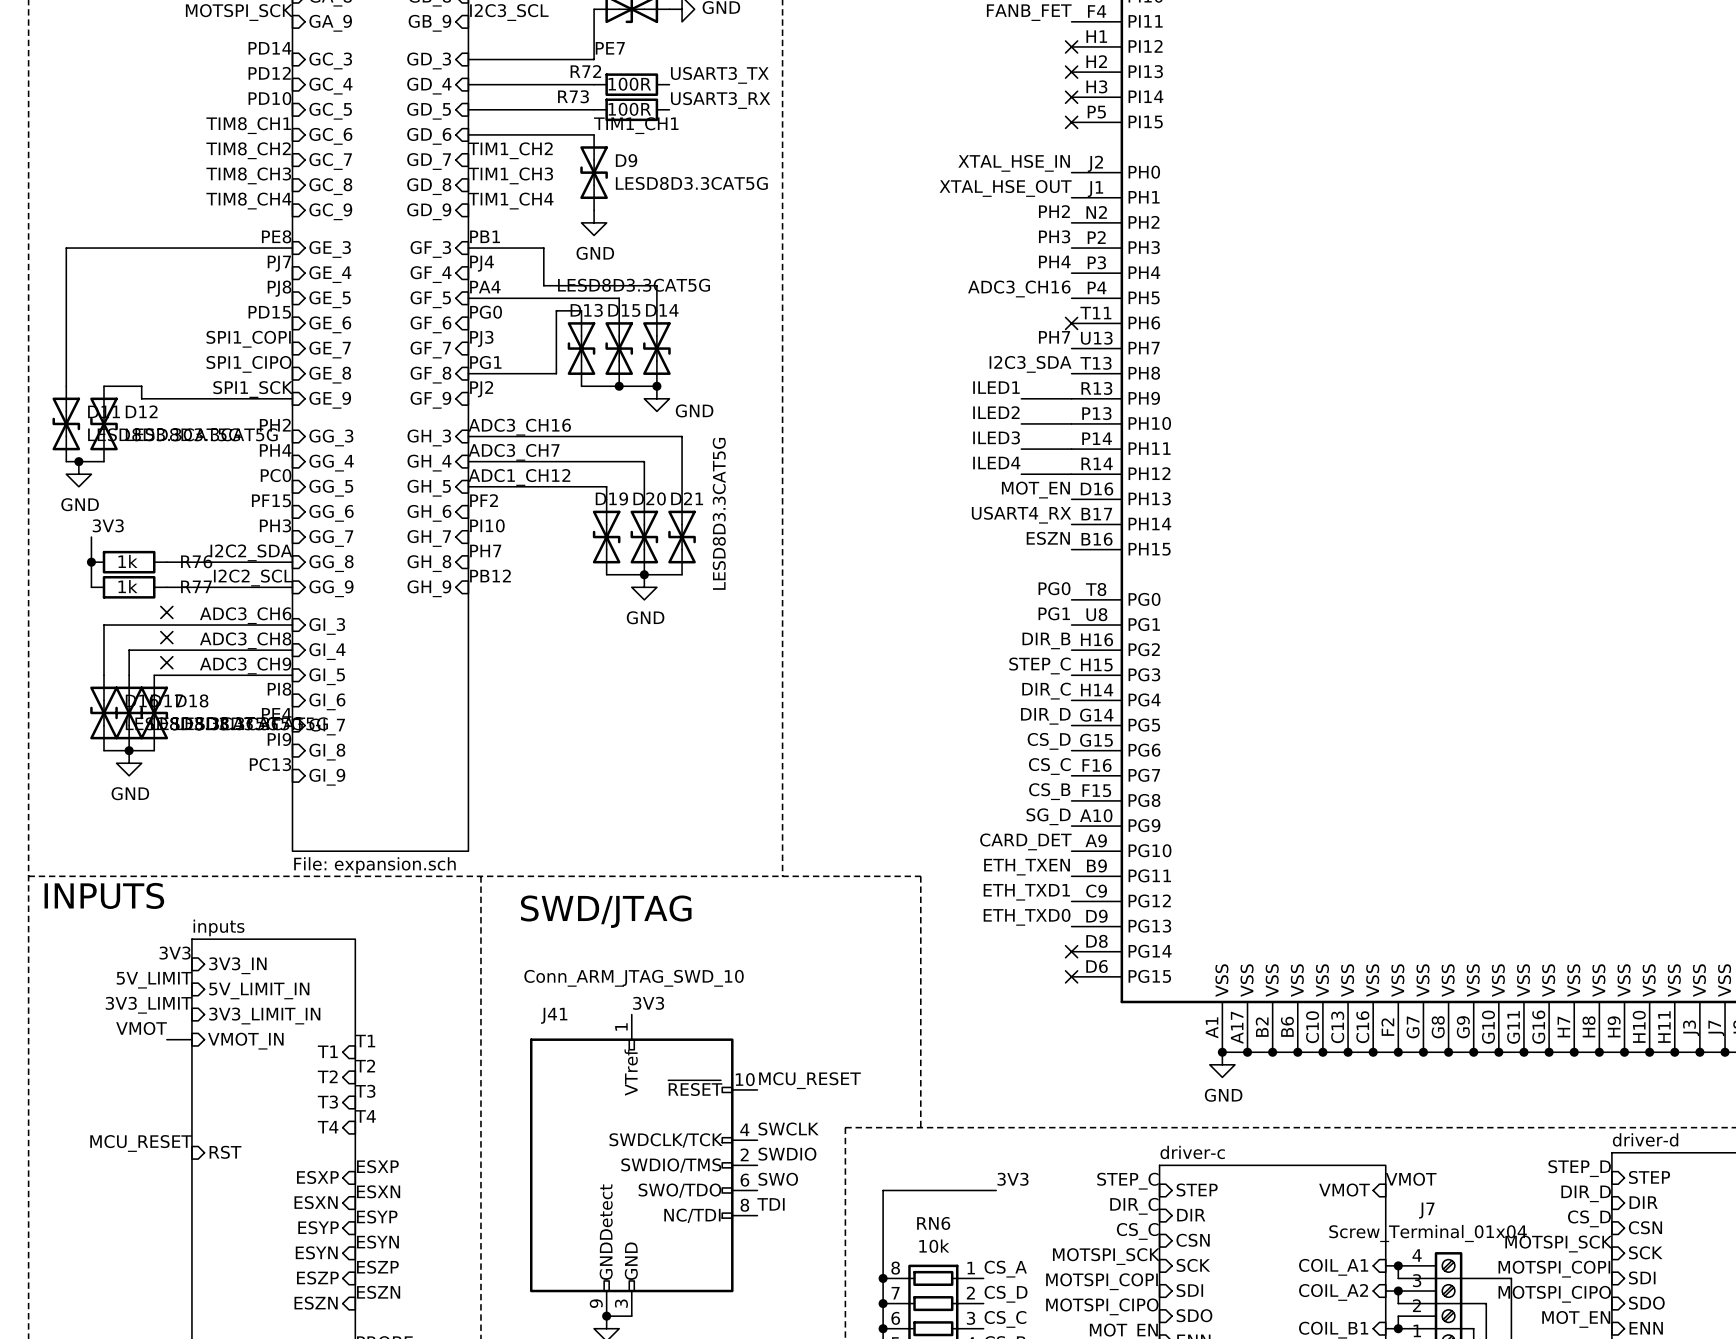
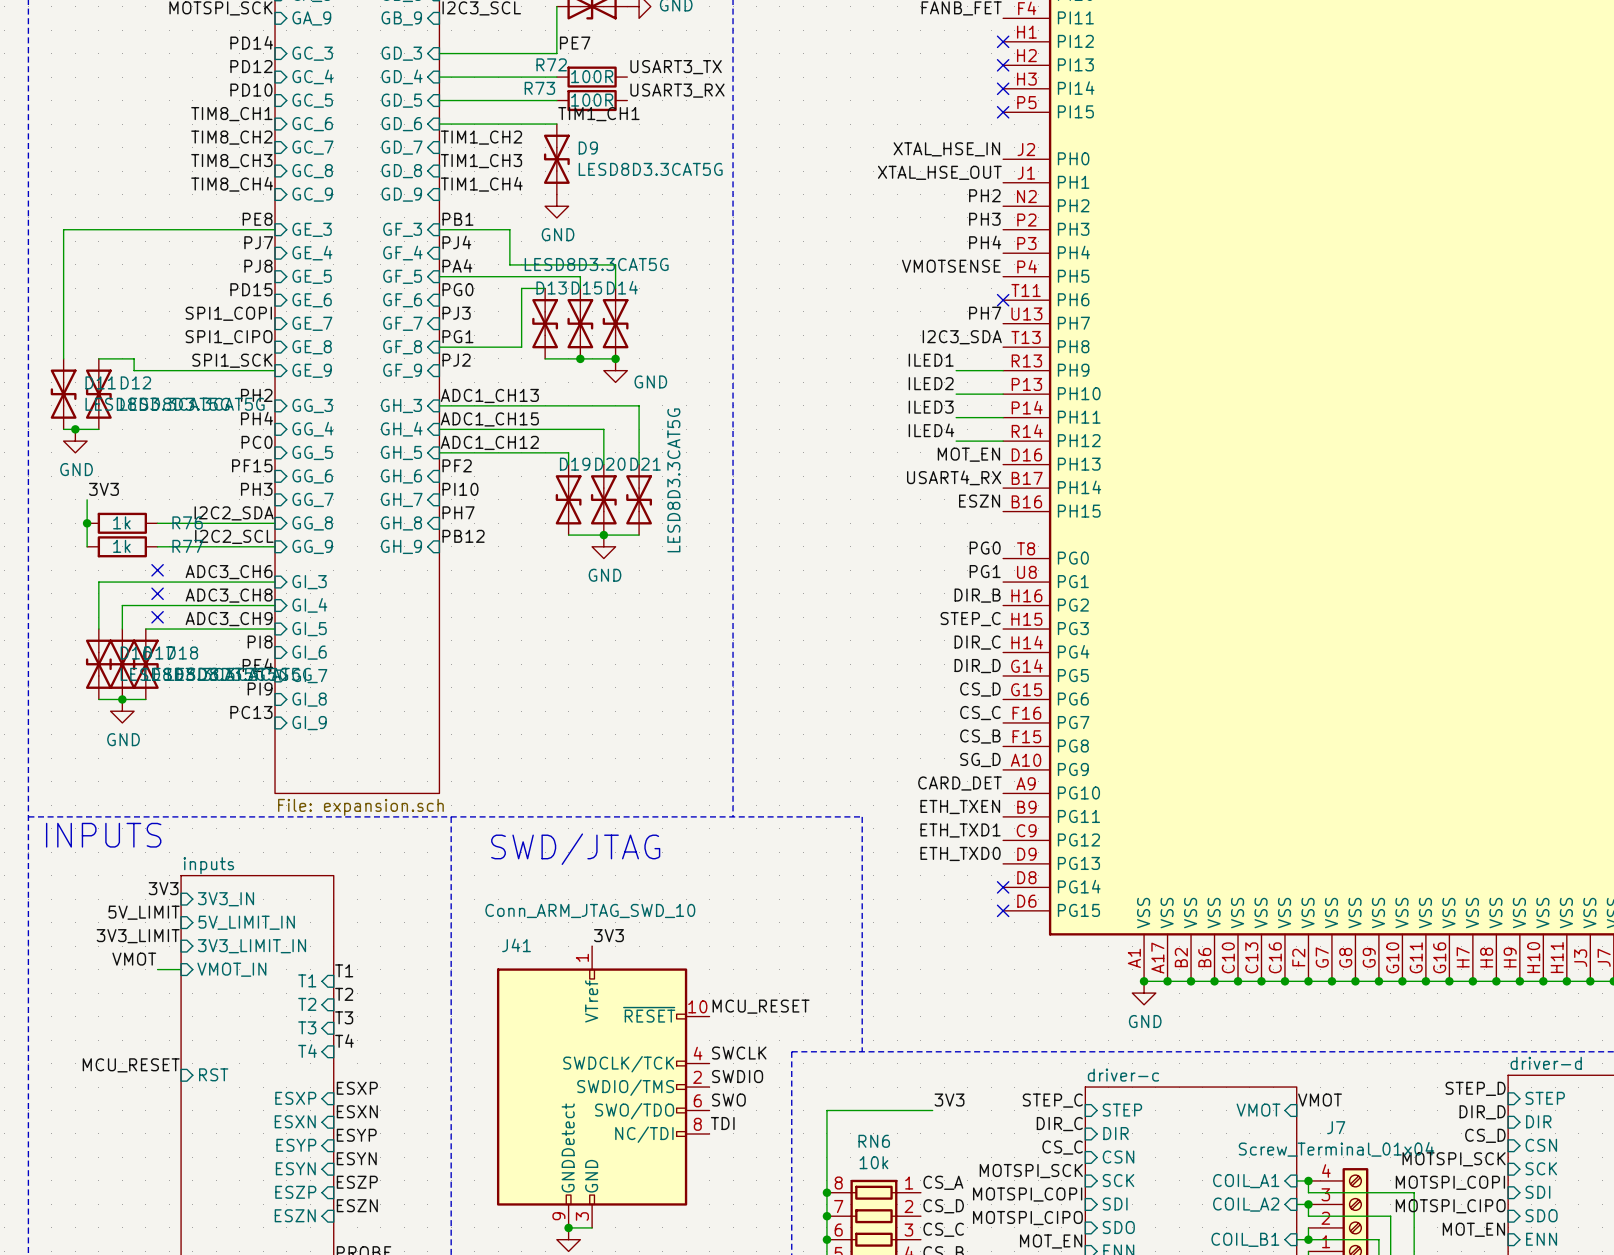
label: ADC3_CH16 (1019, 288) -> VMOTSENSE (951, 266)
label: ADC3_CH16 (519, 427) -> ADC1_CH13 (489, 395)
label: ADC3_CH7 (514, 452) -> ADC1_CH15 (489, 419)

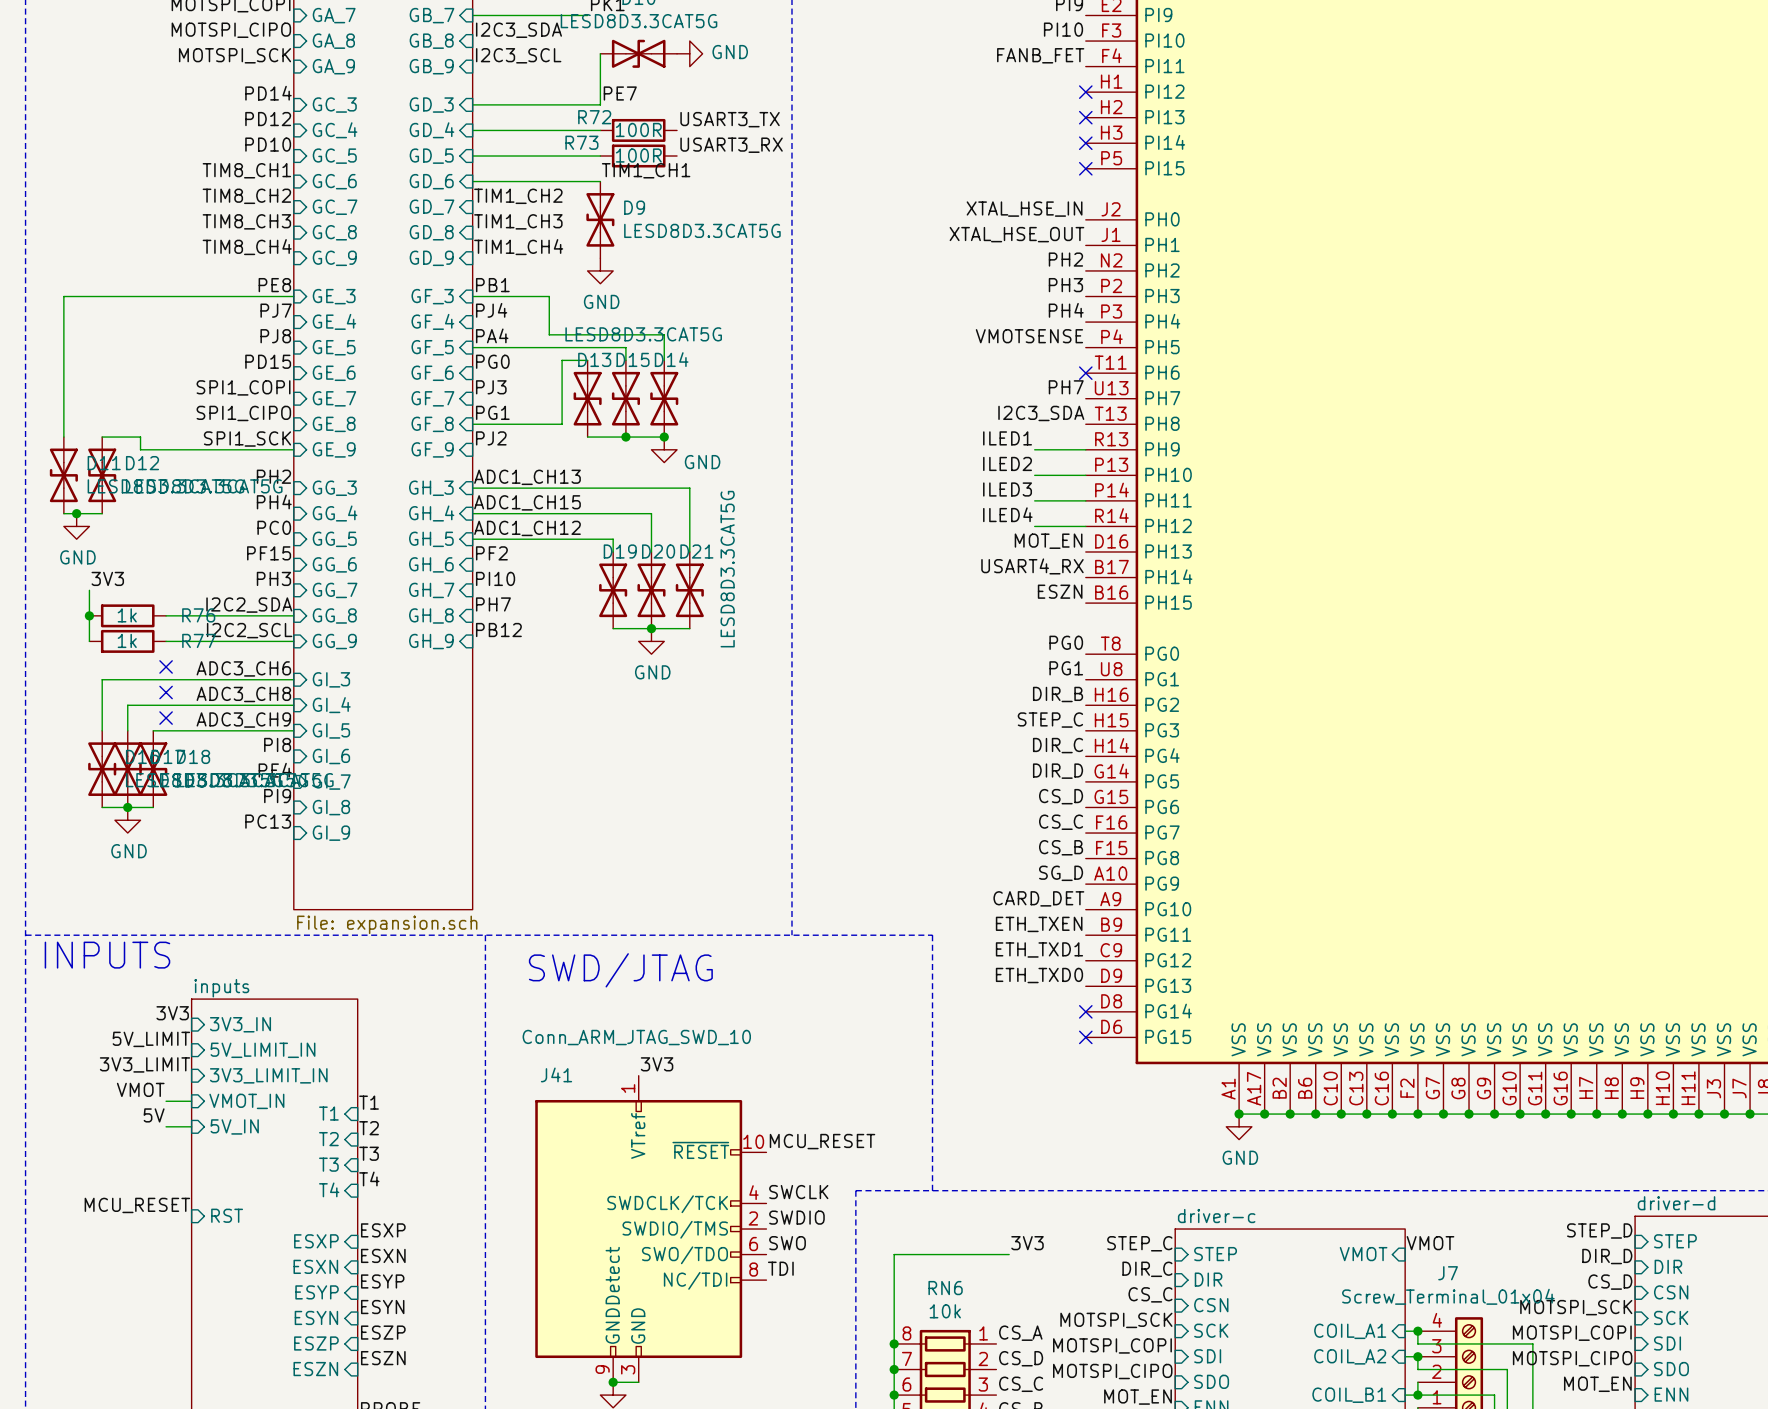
label: none -> 5V (154, 1115)
wire: none -> (166, 1126) (191, 1126)
sheet pin: none -> 5V_IN (234, 1126)

